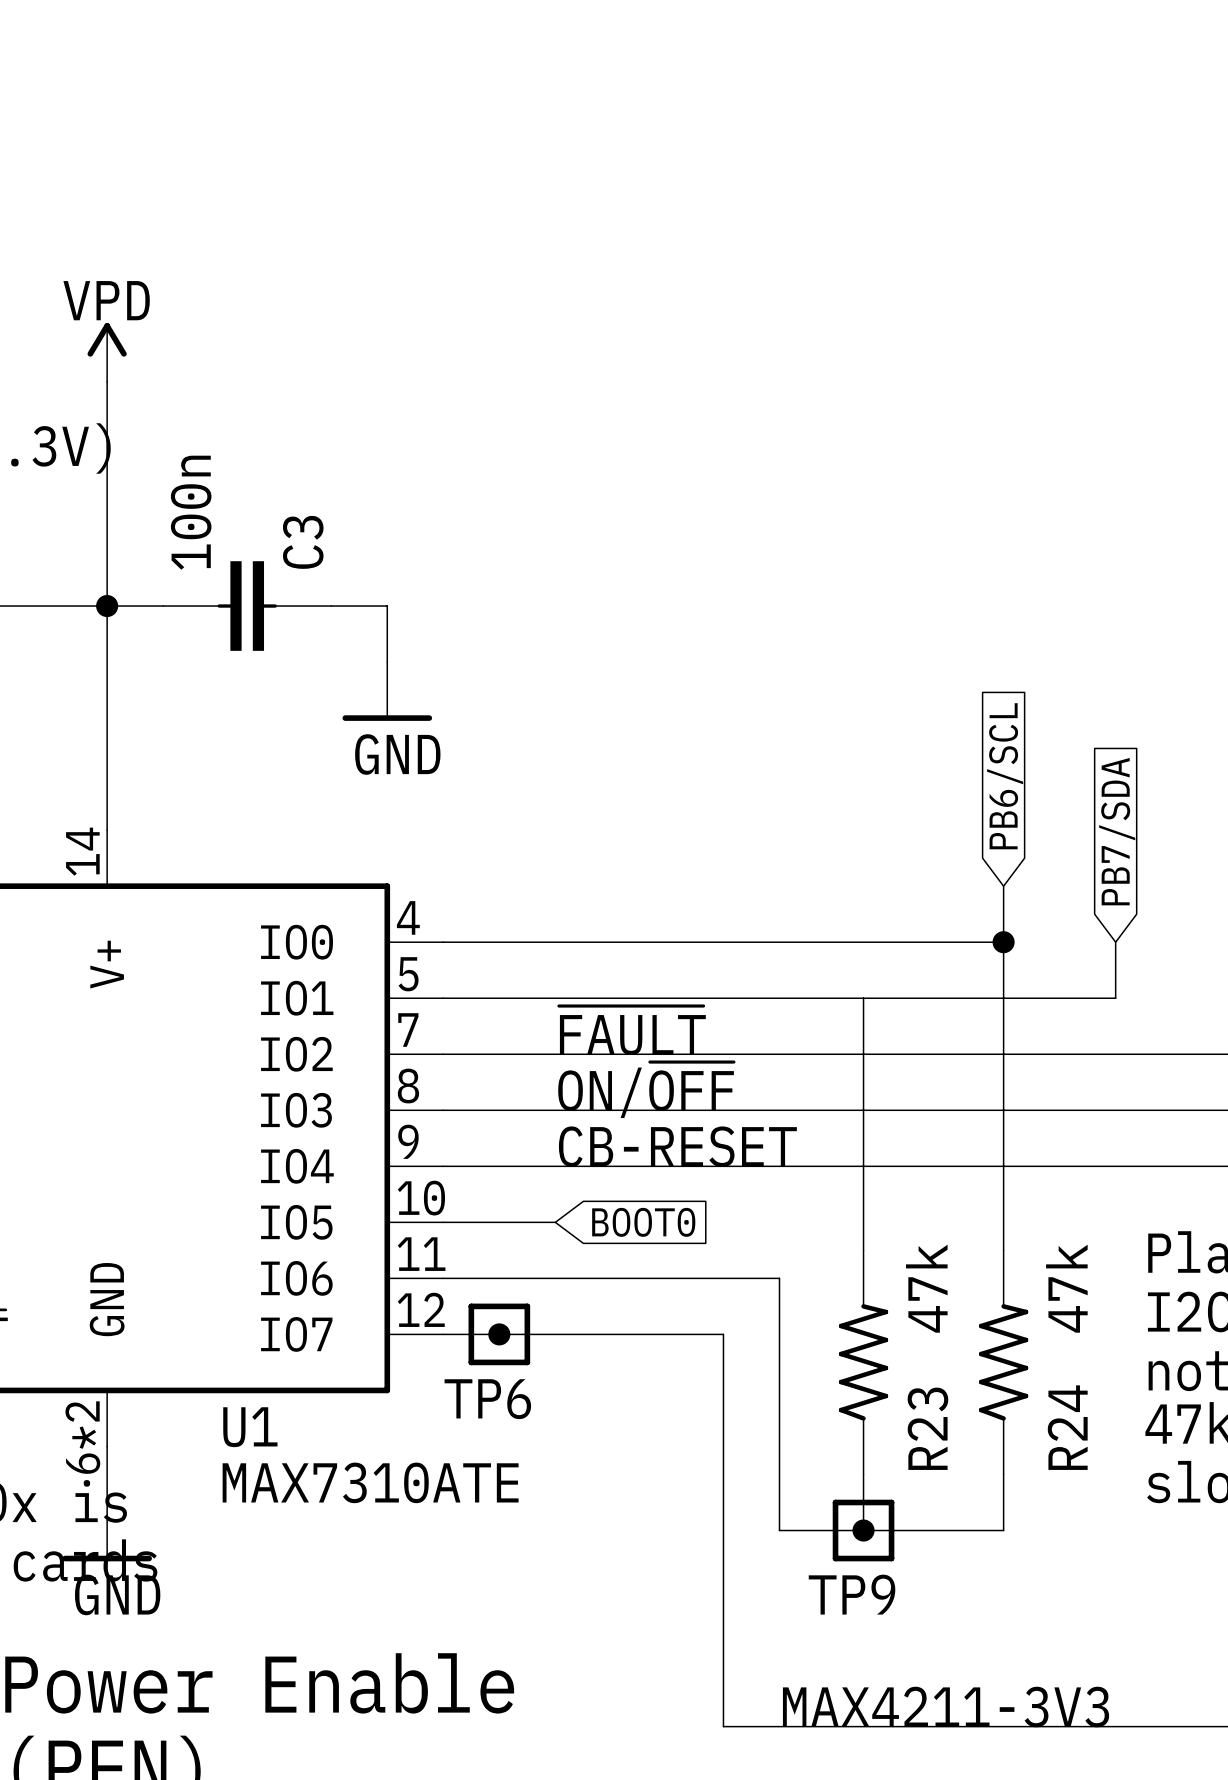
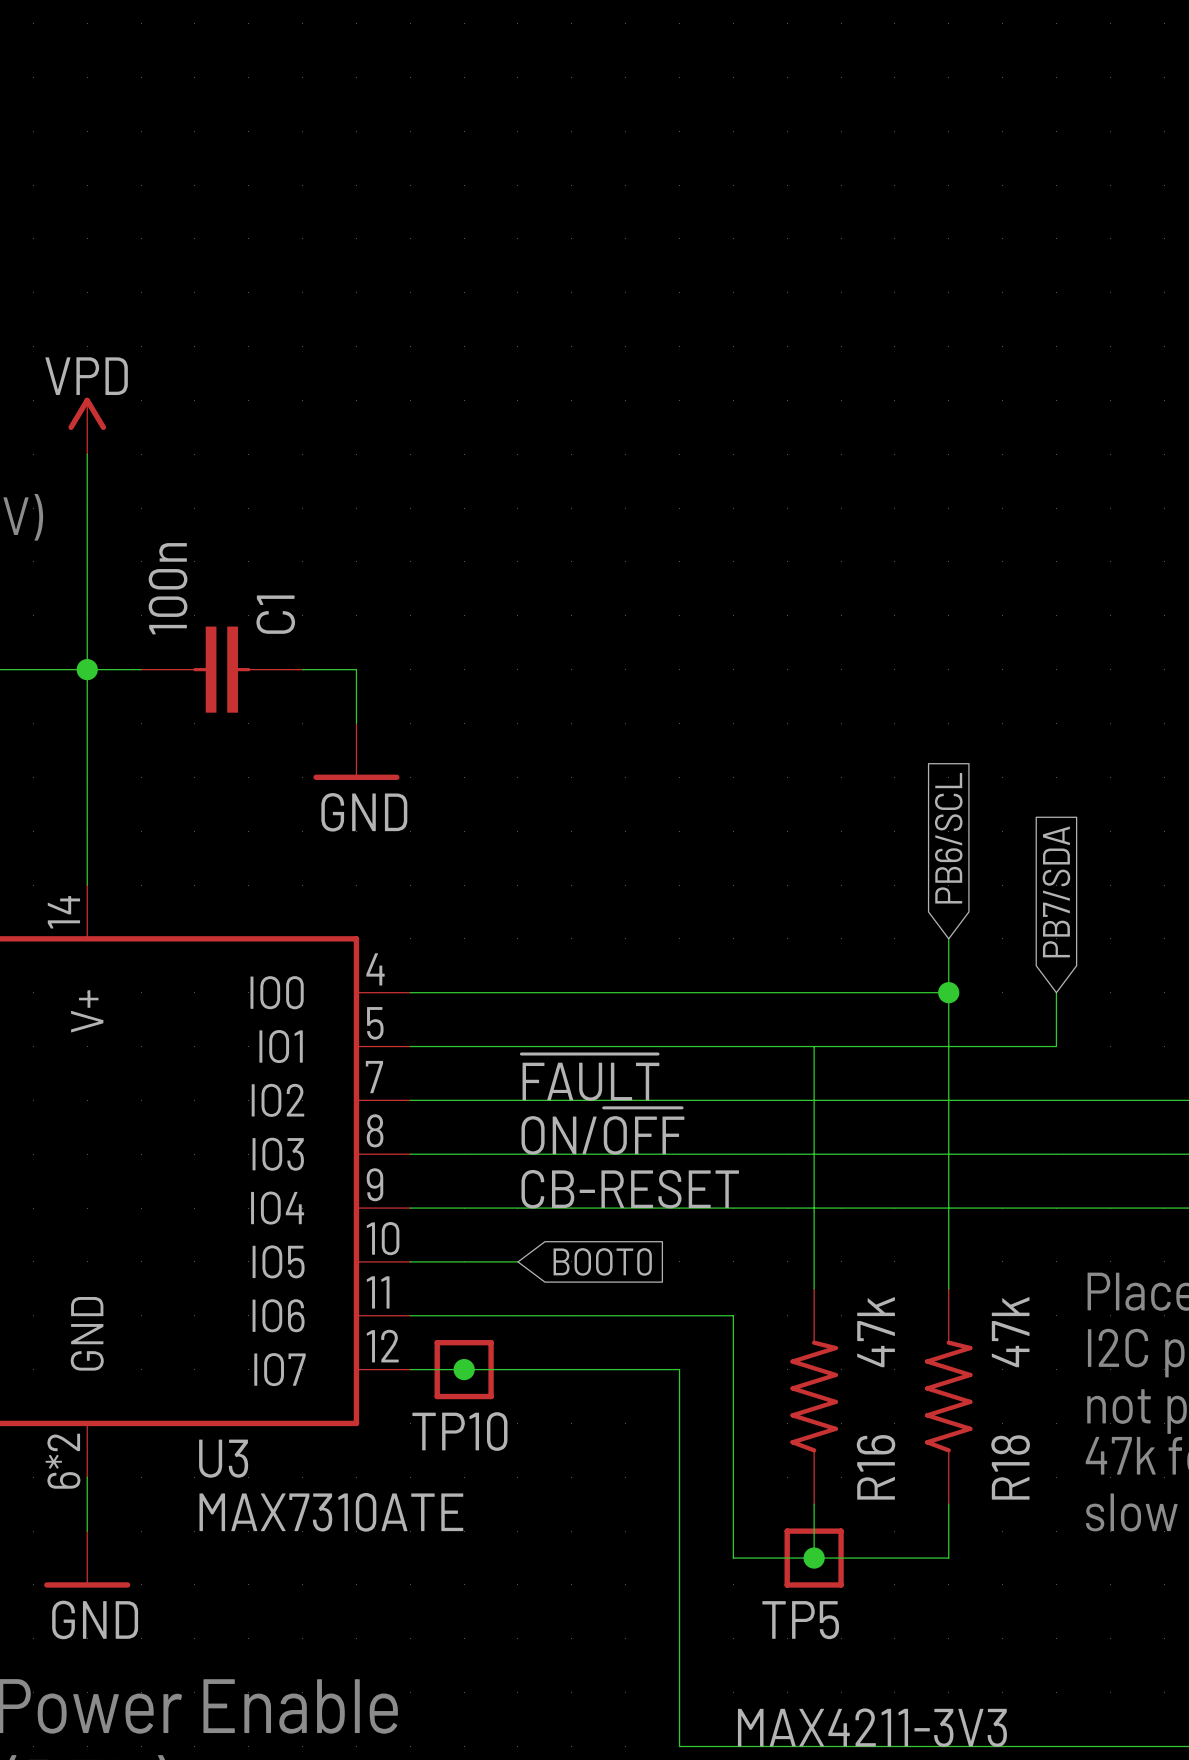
C3 name: C3 (303, 542) -> C1 (275, 614)
TP6 name: TP6 (487, 1399) -> TP10 (459, 1431)
U1 name: U1 (250, 1427) -> U3 (223, 1458)
R24 name: R24 (1067, 1427) -> R18 (1010, 1467)
R23 name: R23 (927, 1428) -> R16 (876, 1467)
TP9 name: TP9 (852, 1594) -> TP5 (800, 1620)

